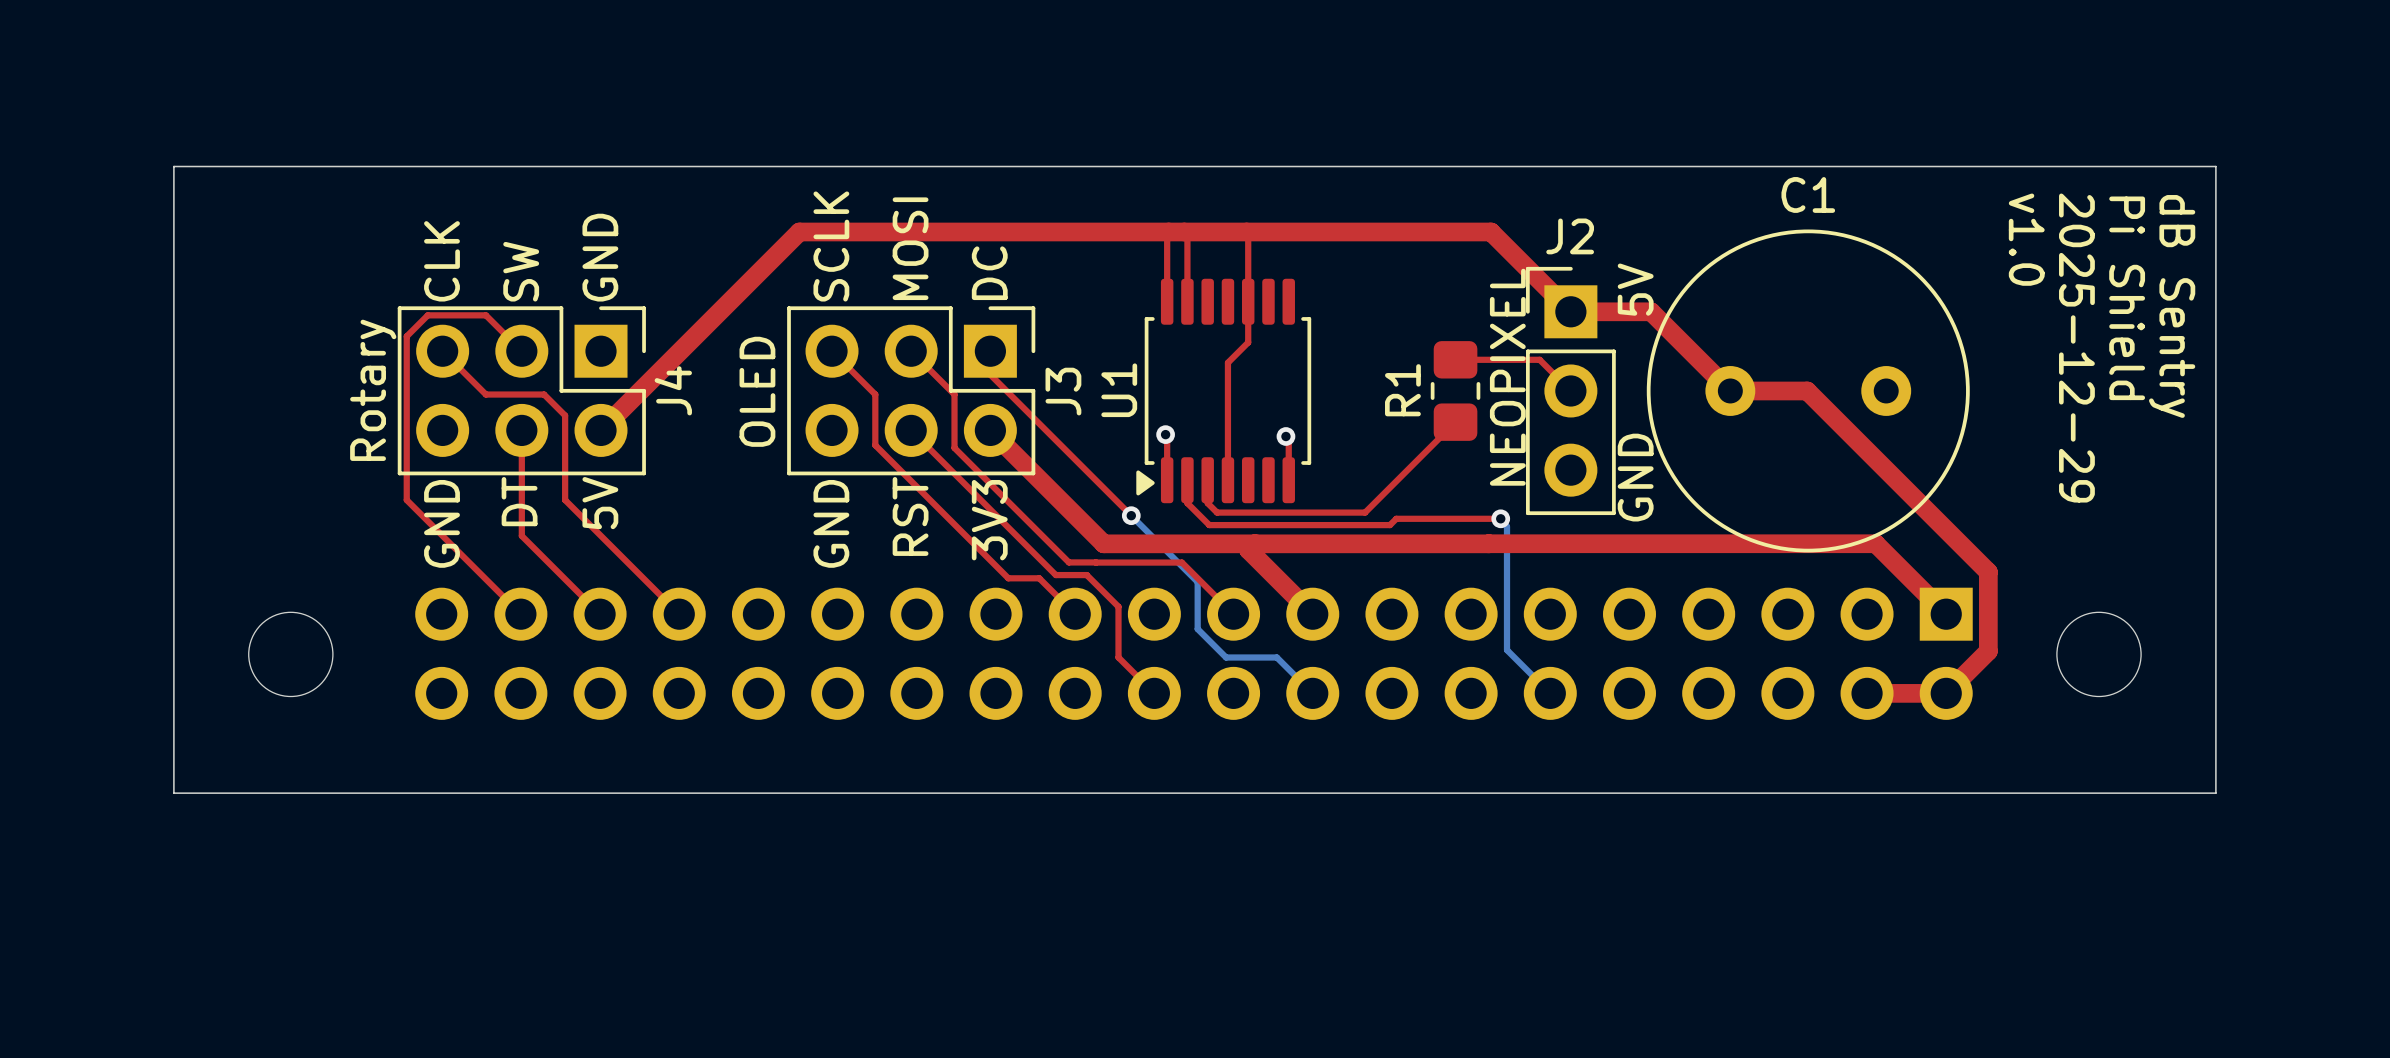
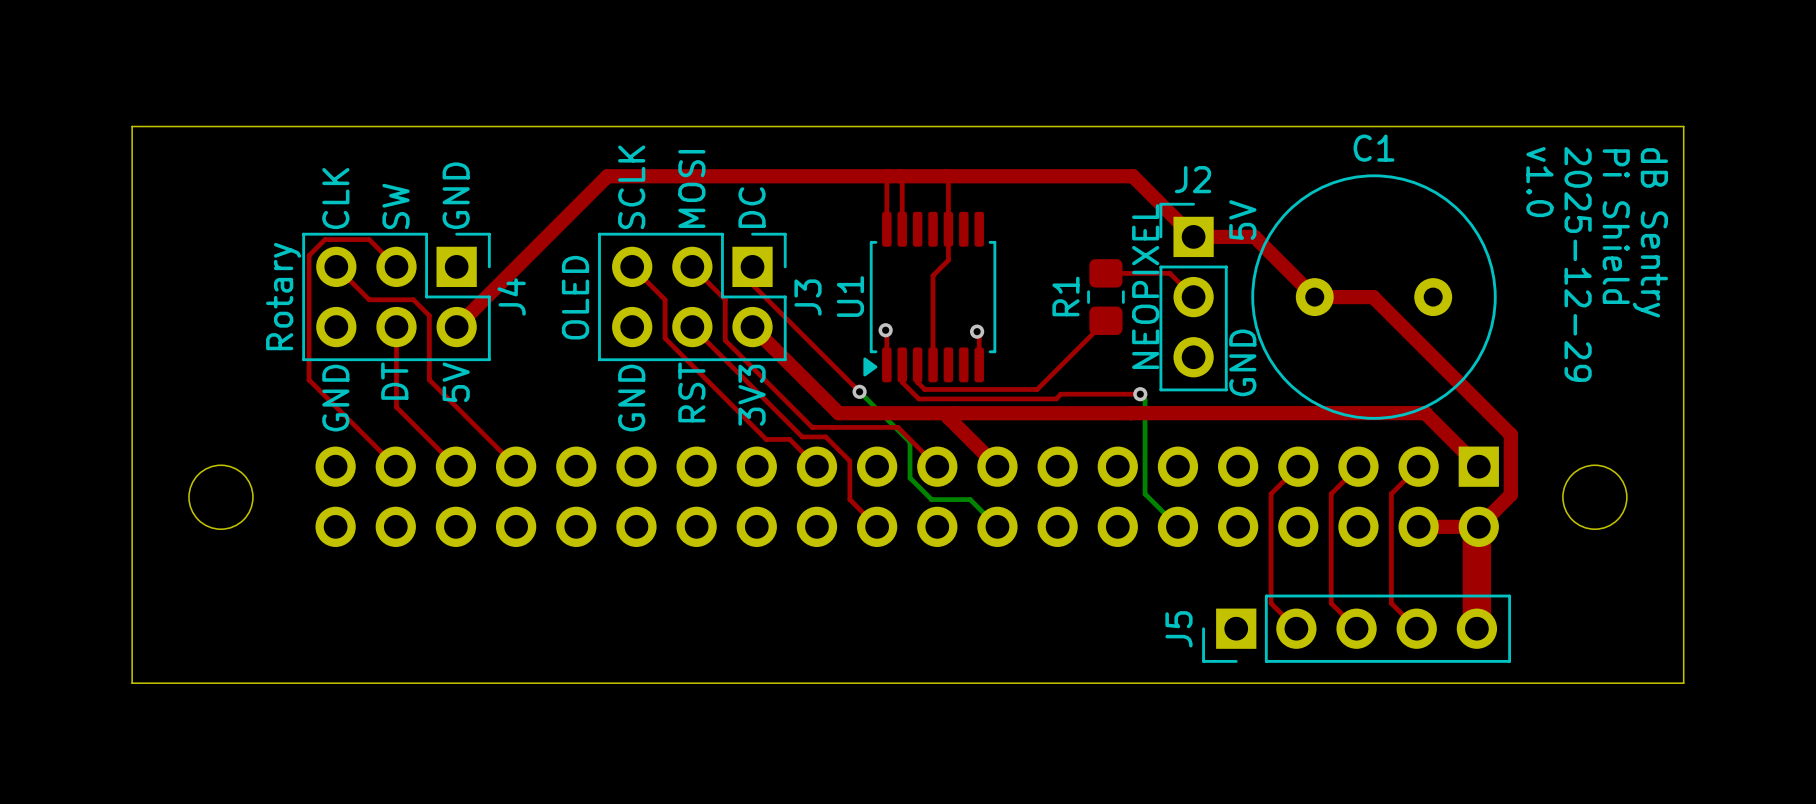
top track: none -> (1298, 466) (1271, 493) (1271, 603) (1296, 628)
top track: none -> (1358, 466) (1331, 493) (1331, 603) (1356, 628)
top track: none -> (1418, 466) (1391, 493) (1391, 603) (1416, 628)
top track: none -> (1478, 526) (1476, 528) (1476, 628)
board edge: (173, 793) (2215, 793) -> (132, 602) (132, 683) (1683, 683) (1683, 602)
J5: none -> (1356, 628)

